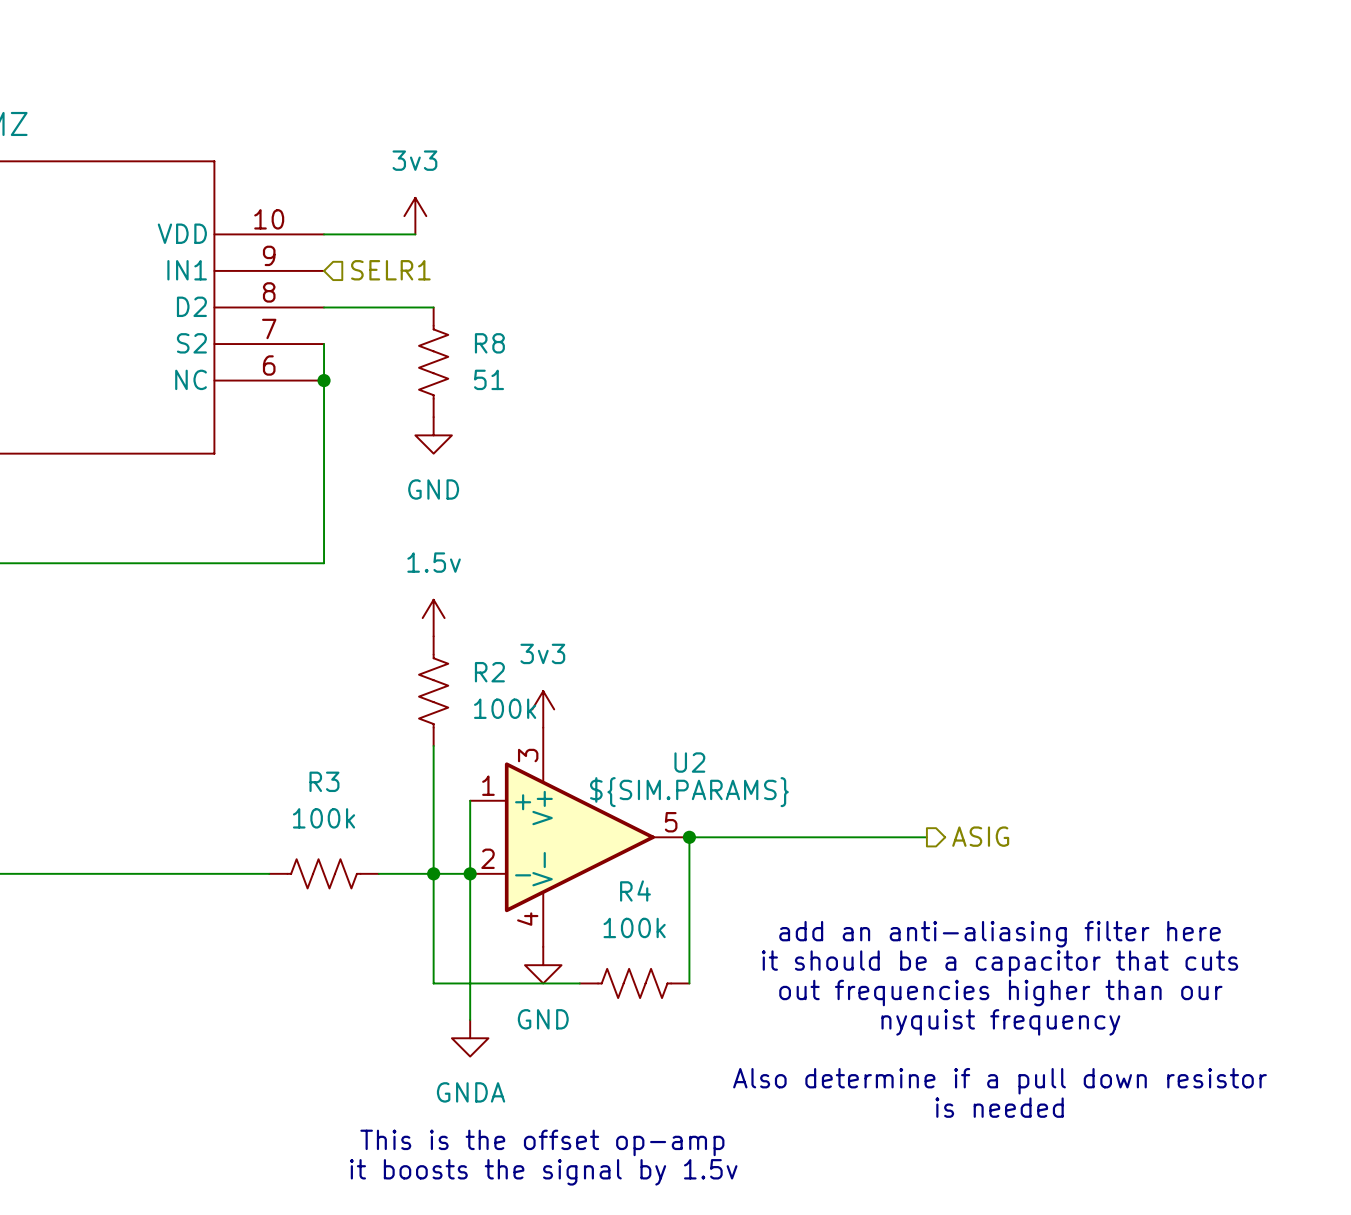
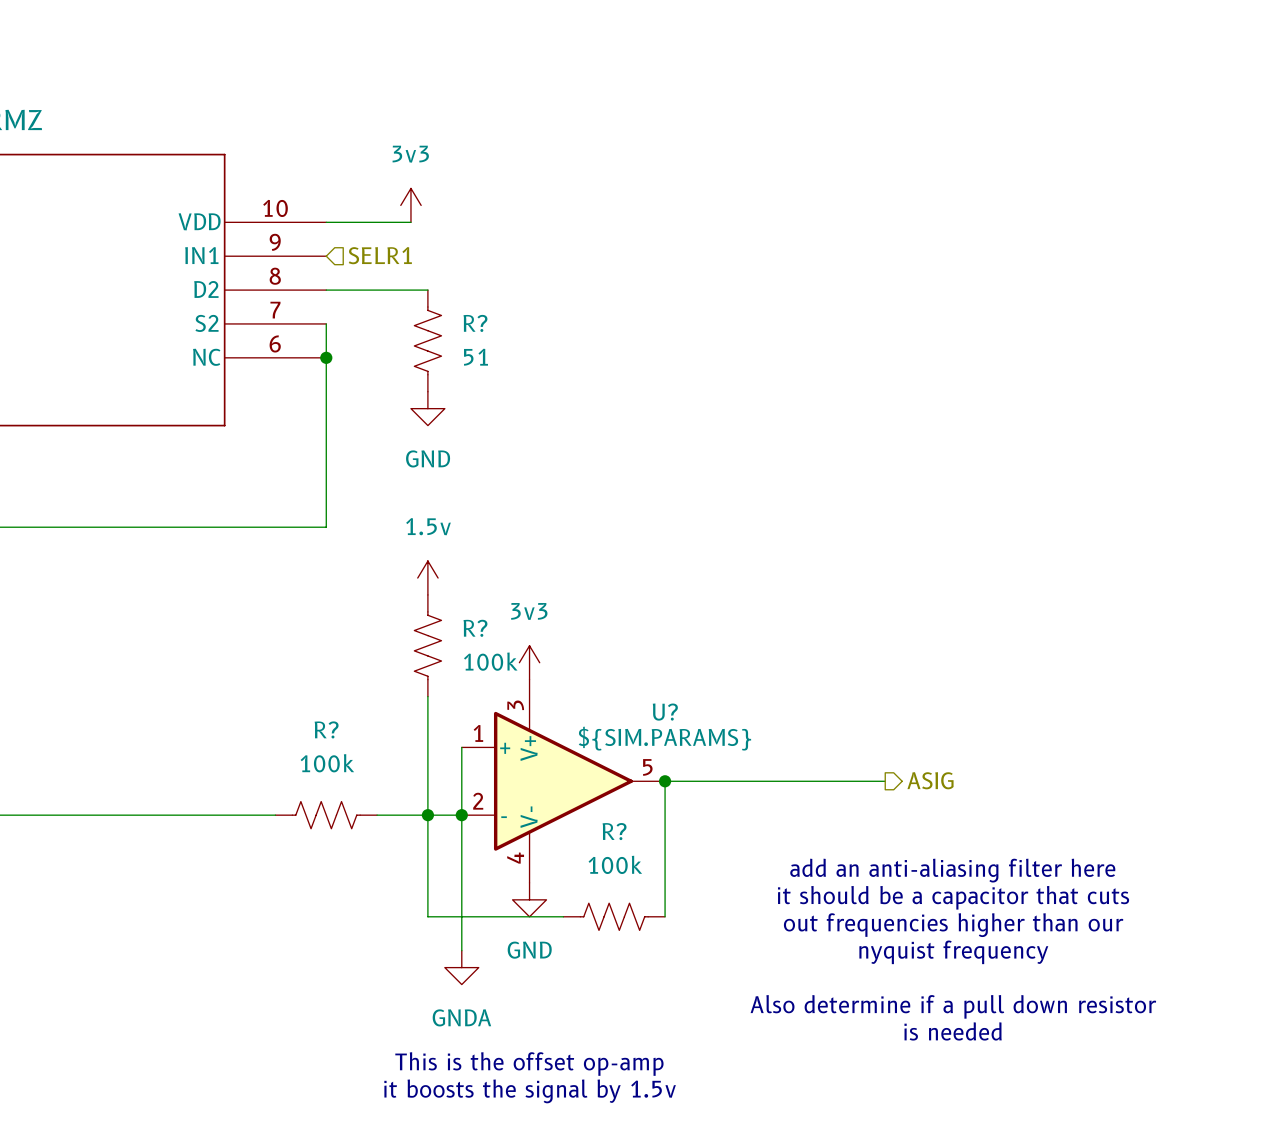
R8 name: R8 (489, 343) -> R? (475, 323)
R2 name: R2 (489, 672) -> R? (475, 628)
U2 name: U2 (689, 762) -> U? (665, 712)
R3 name: R3 (324, 781) -> R? (326, 729)
R4 name: R4 (635, 890) -> R? (614, 831)

